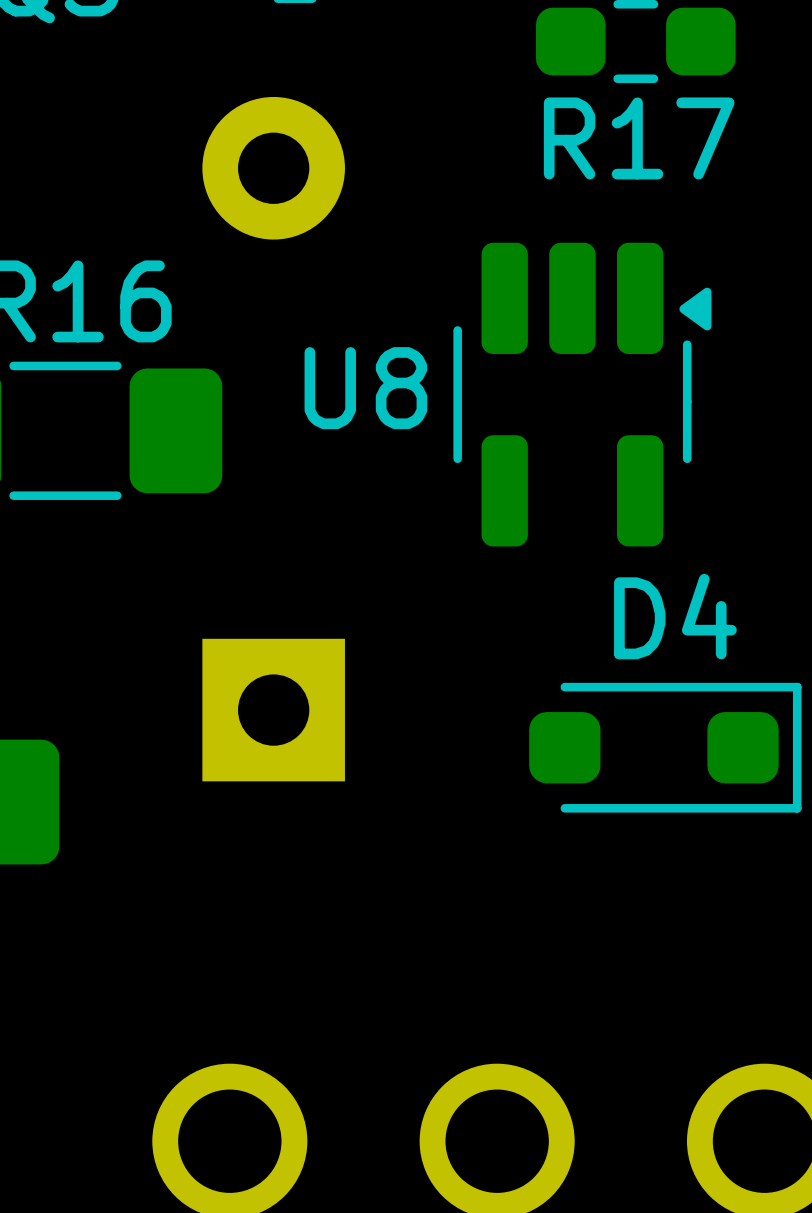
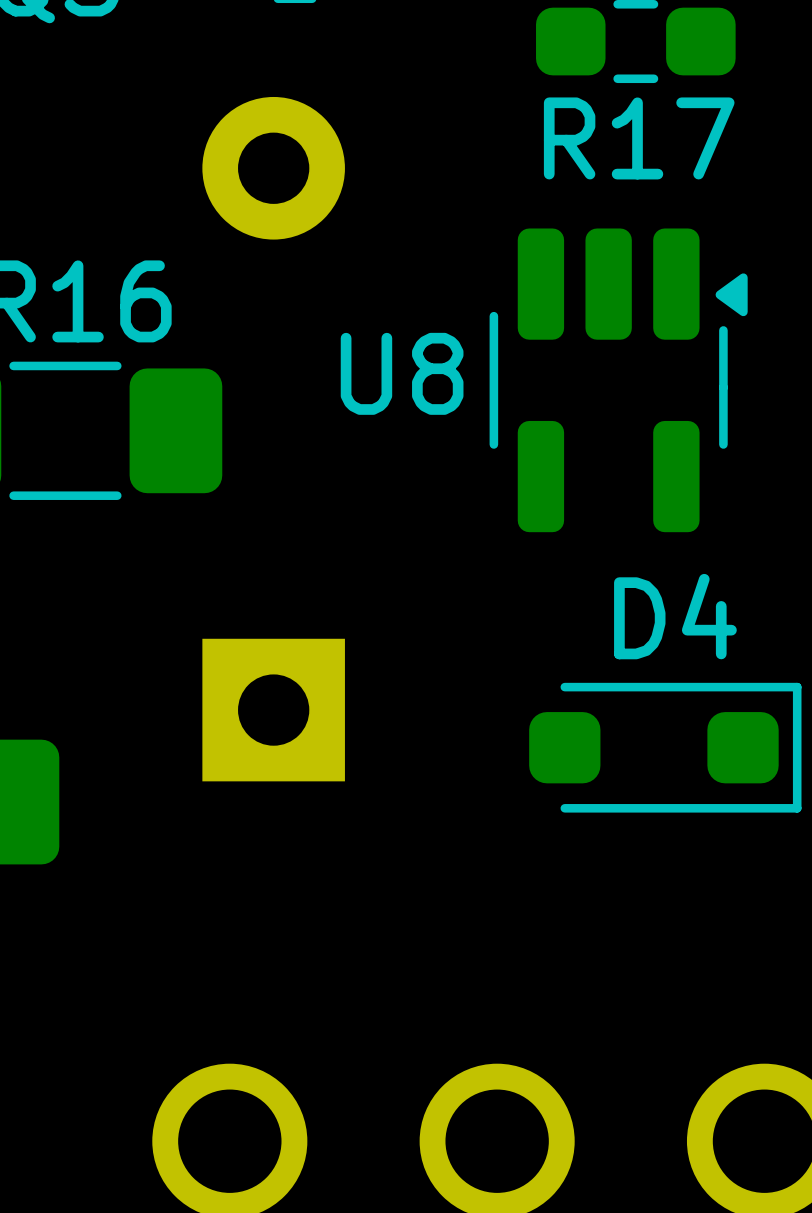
U8 position: (582, 394) -> (618, 380)

